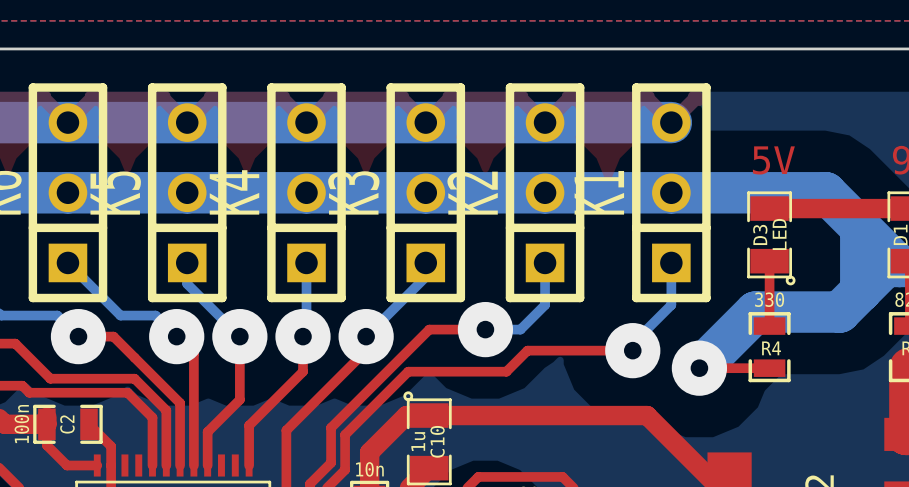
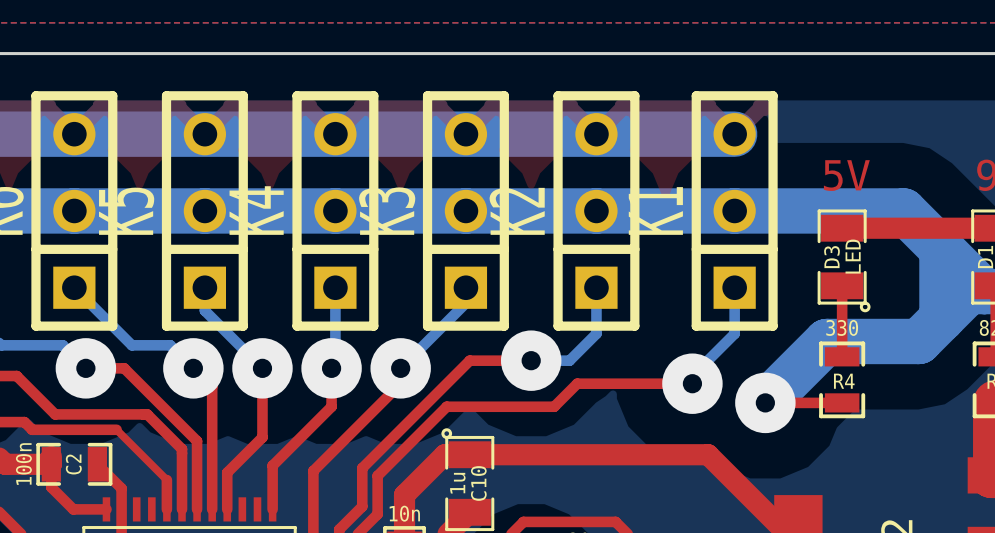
top track: (106, 392) (127, 392) (152, 417) (152, 438) -> (116, 429) (166, 480)

